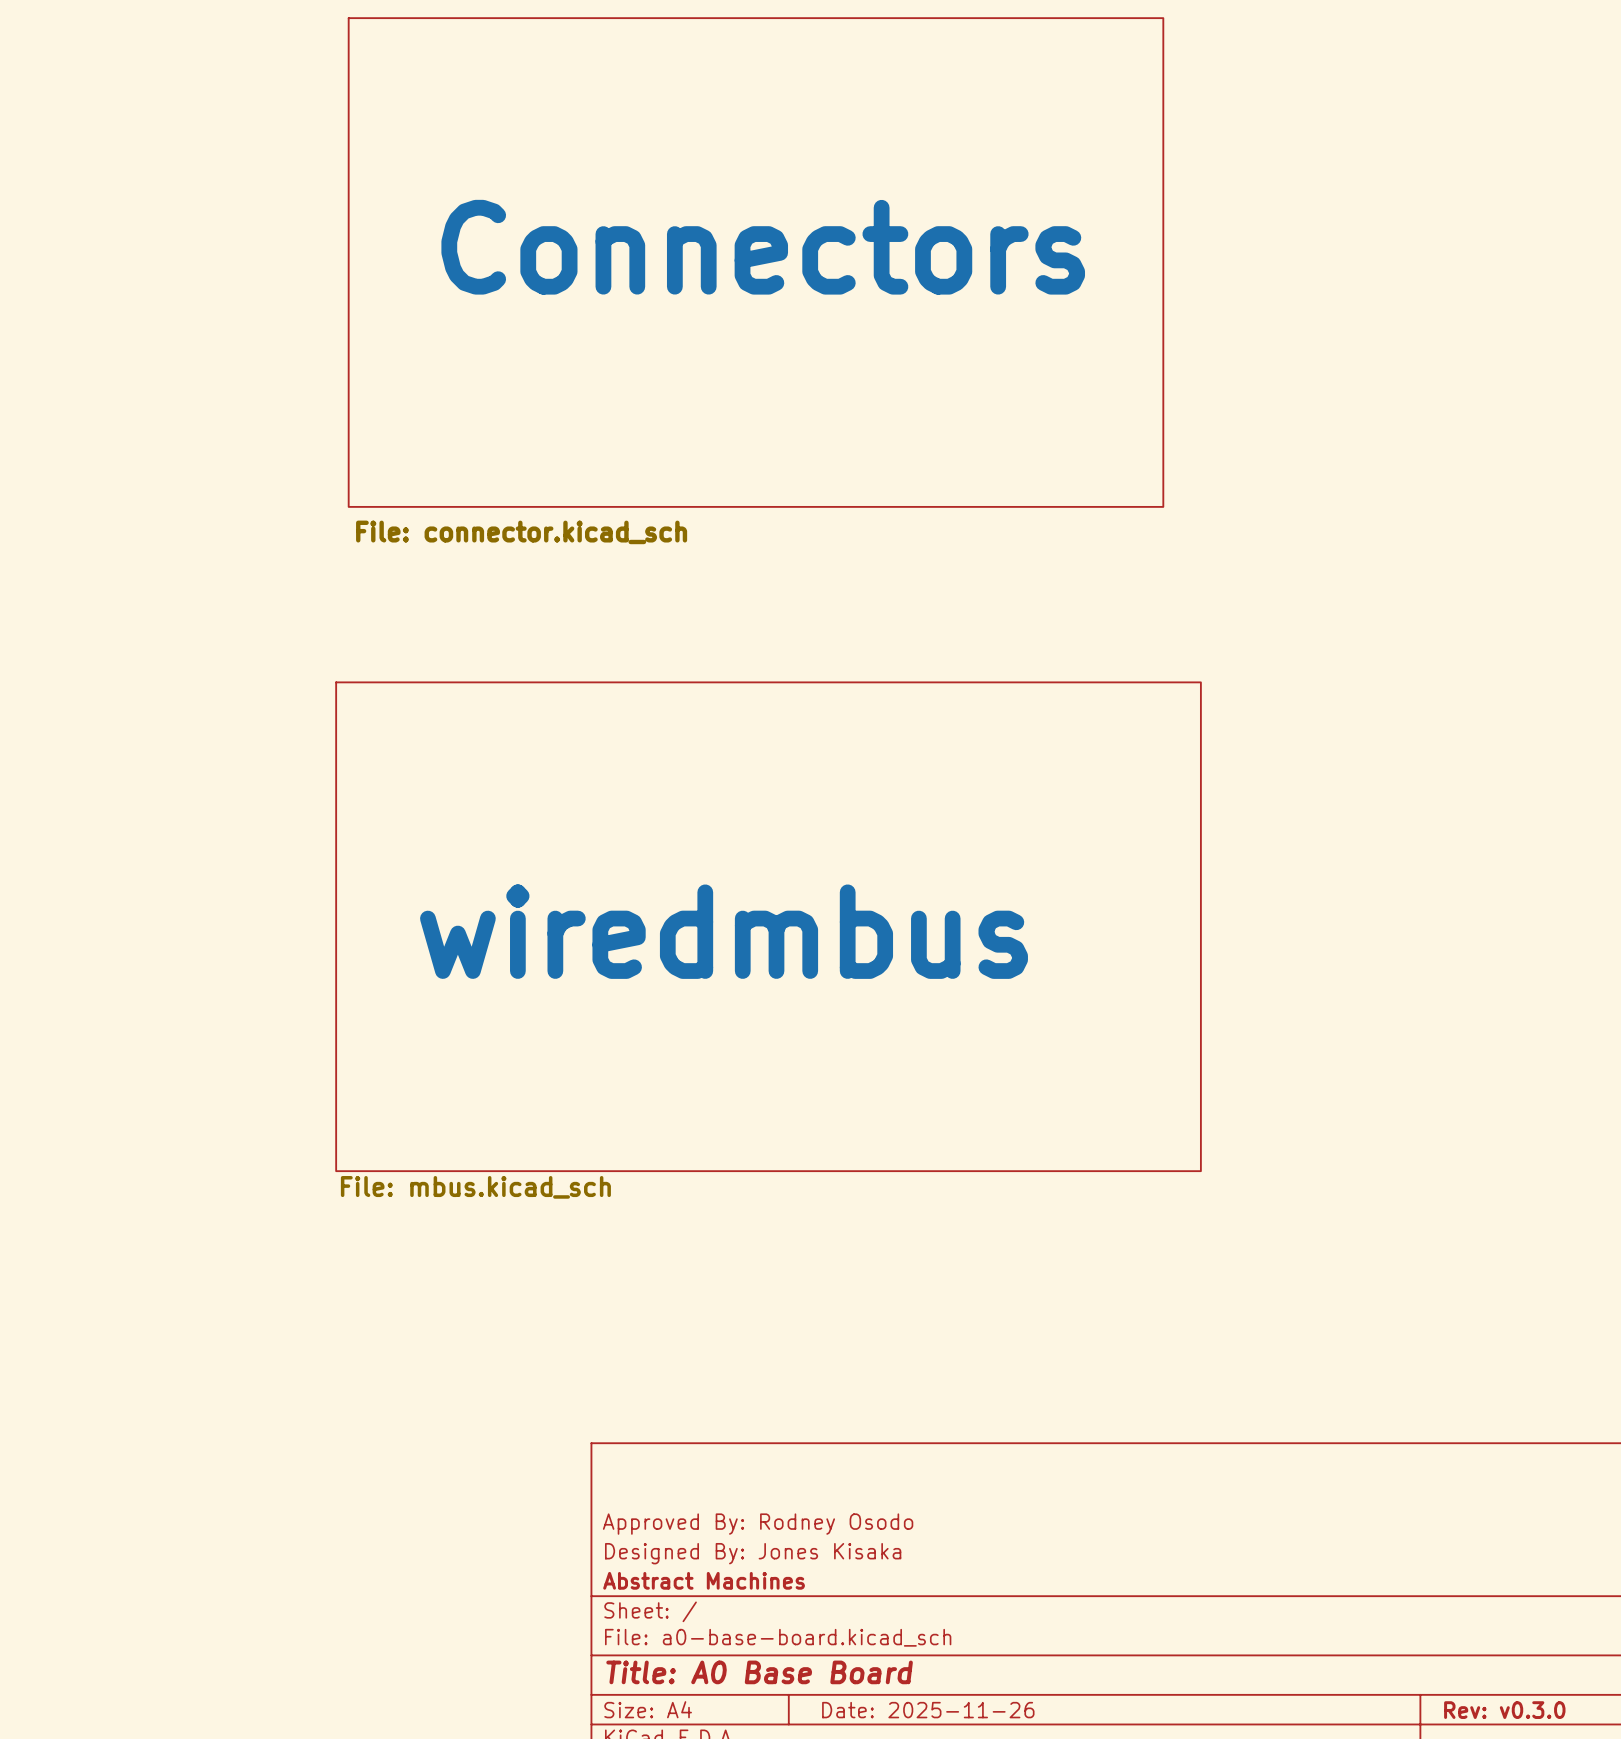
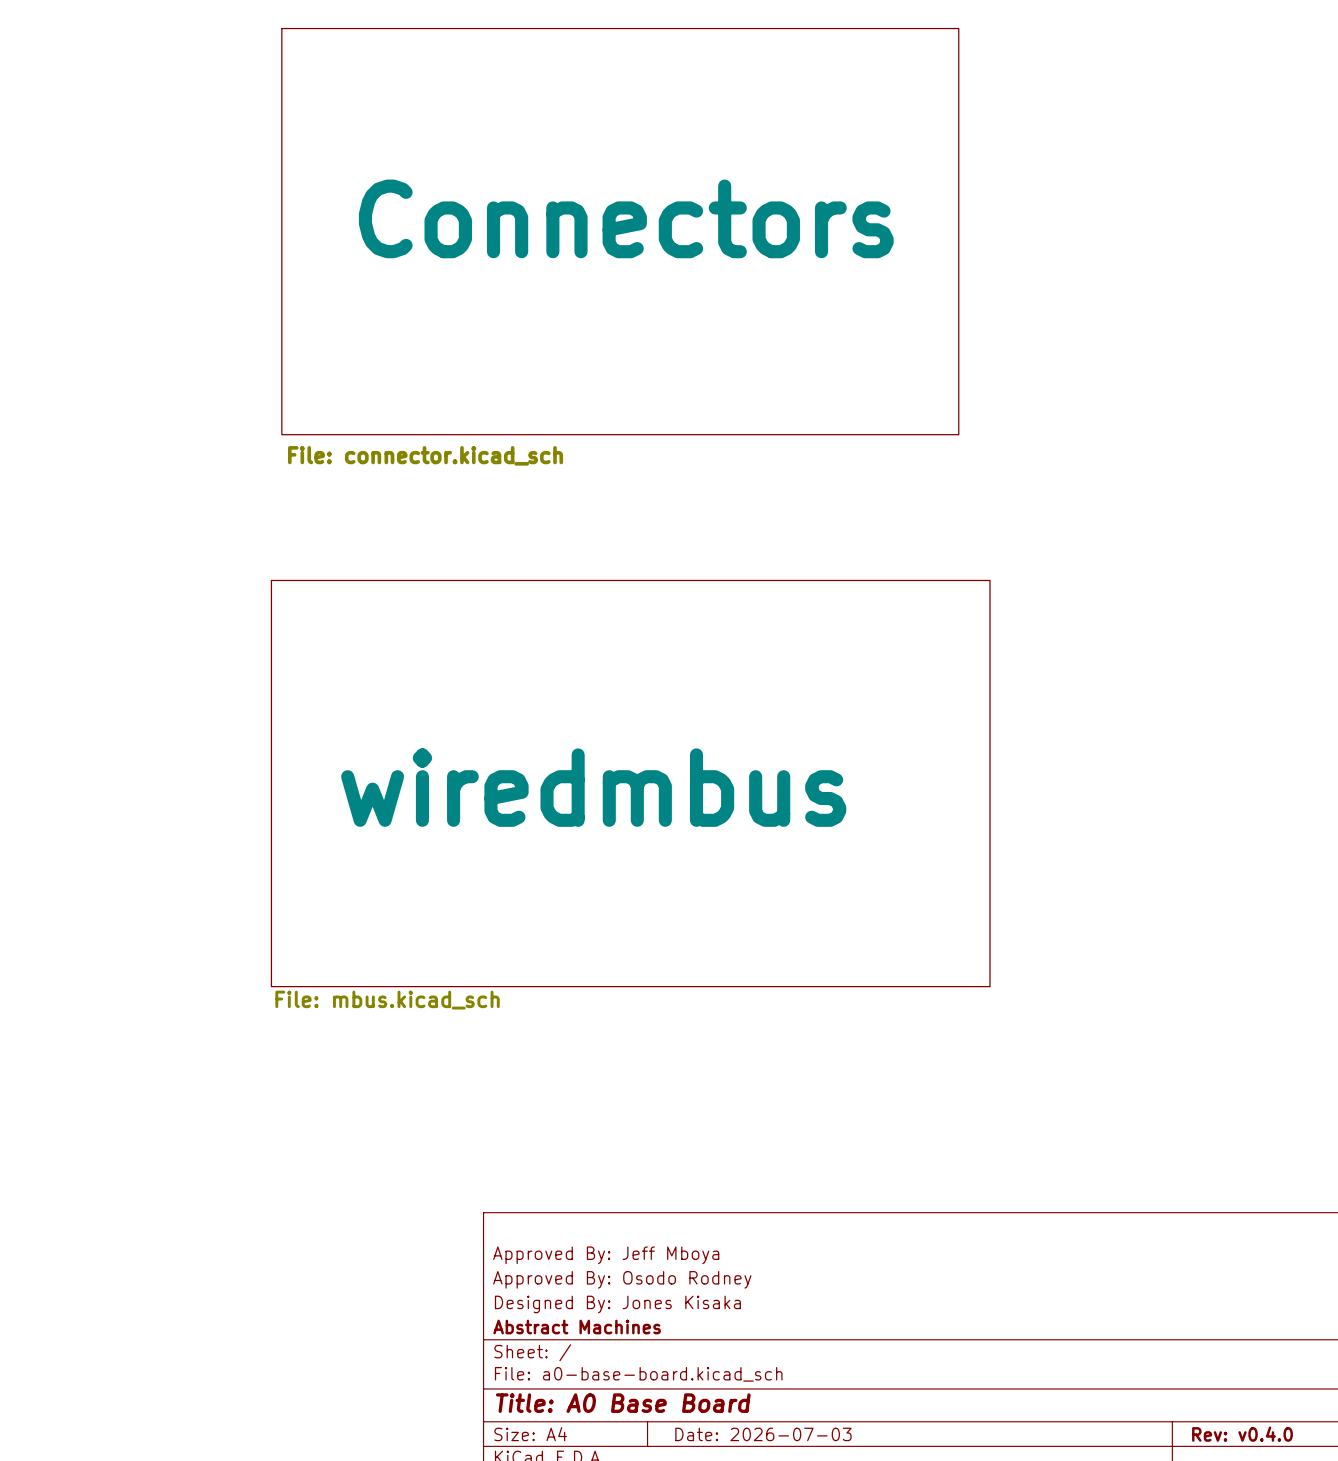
title block: none -> Approved By: Jeff Mboya (606, 1255)
title block: Approved By: Rodney Osodo (758, 1524) -> Approved By: Osodo Rodney (622, 1279)
title block: Date: 2025-11-26 (928, 1710) -> Date: 2026-07-03 (763, 1434)
title block: Rev: v0.3.0 (1504, 1710) -> Rev: v0.4.0 (1242, 1434)

